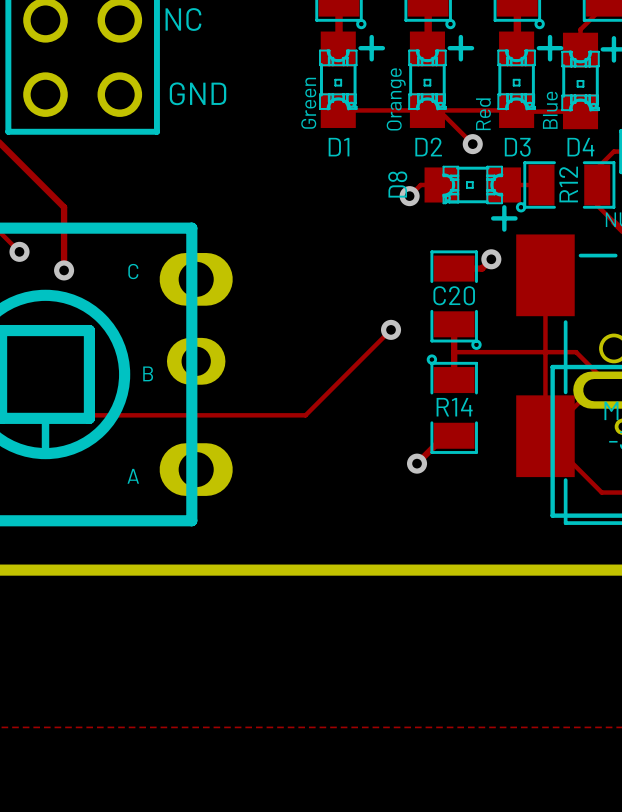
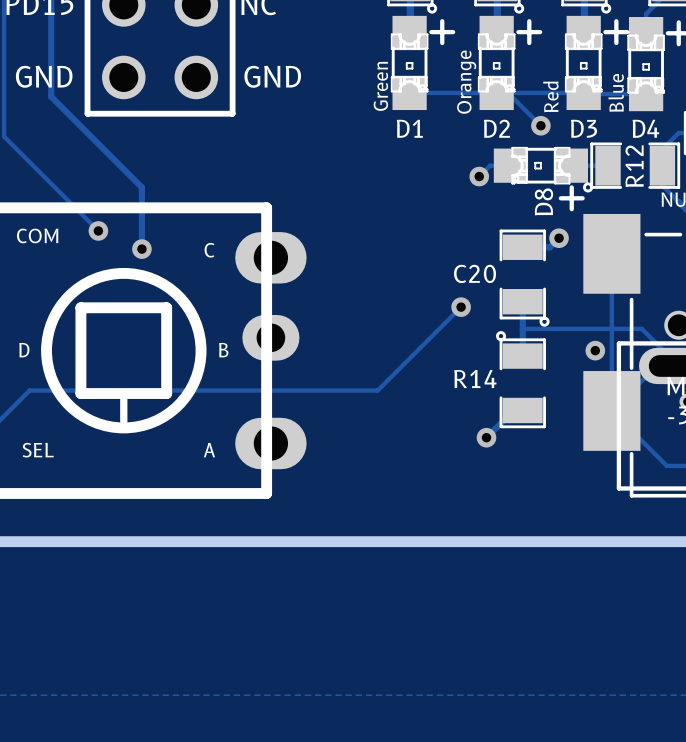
D8 name position: D8 (397, 184) -> D8 (543, 201)
C20 name position: C20 (454, 295) -> C20 (475, 273)
via: none -> (595, 350)
R14 name position: R14 (454, 407) -> R14 (475, 378)

